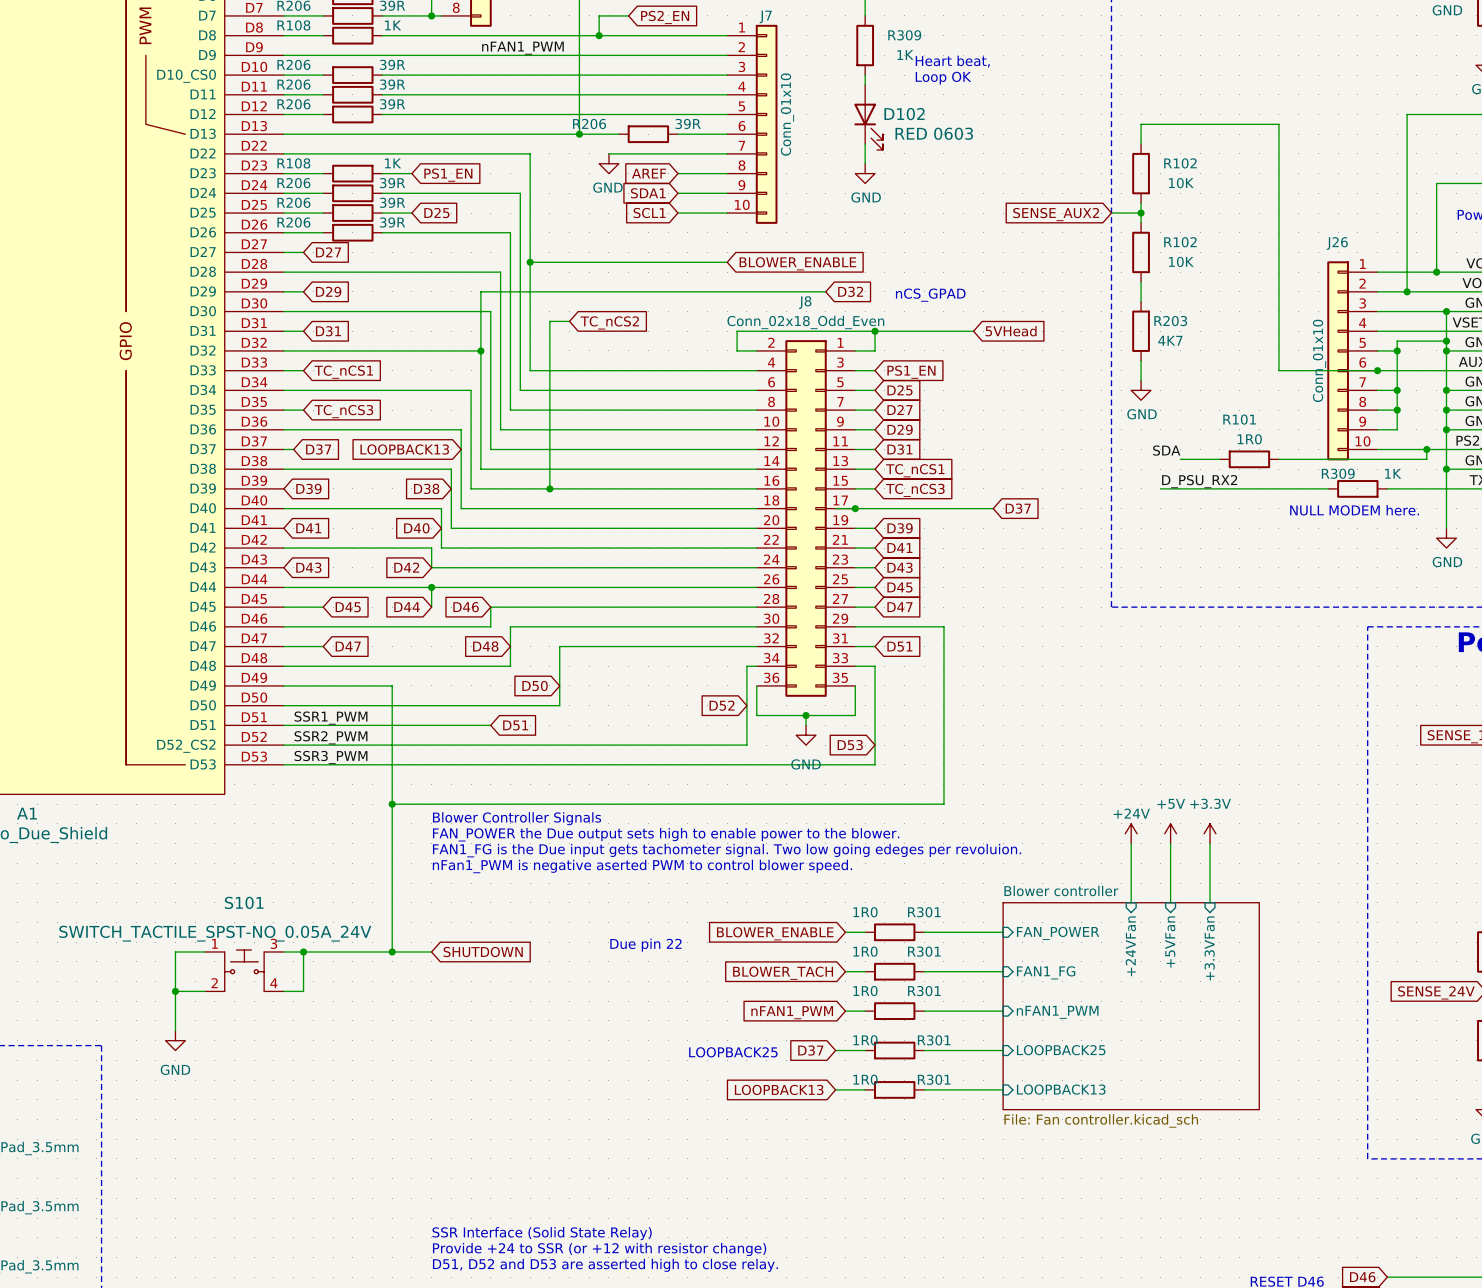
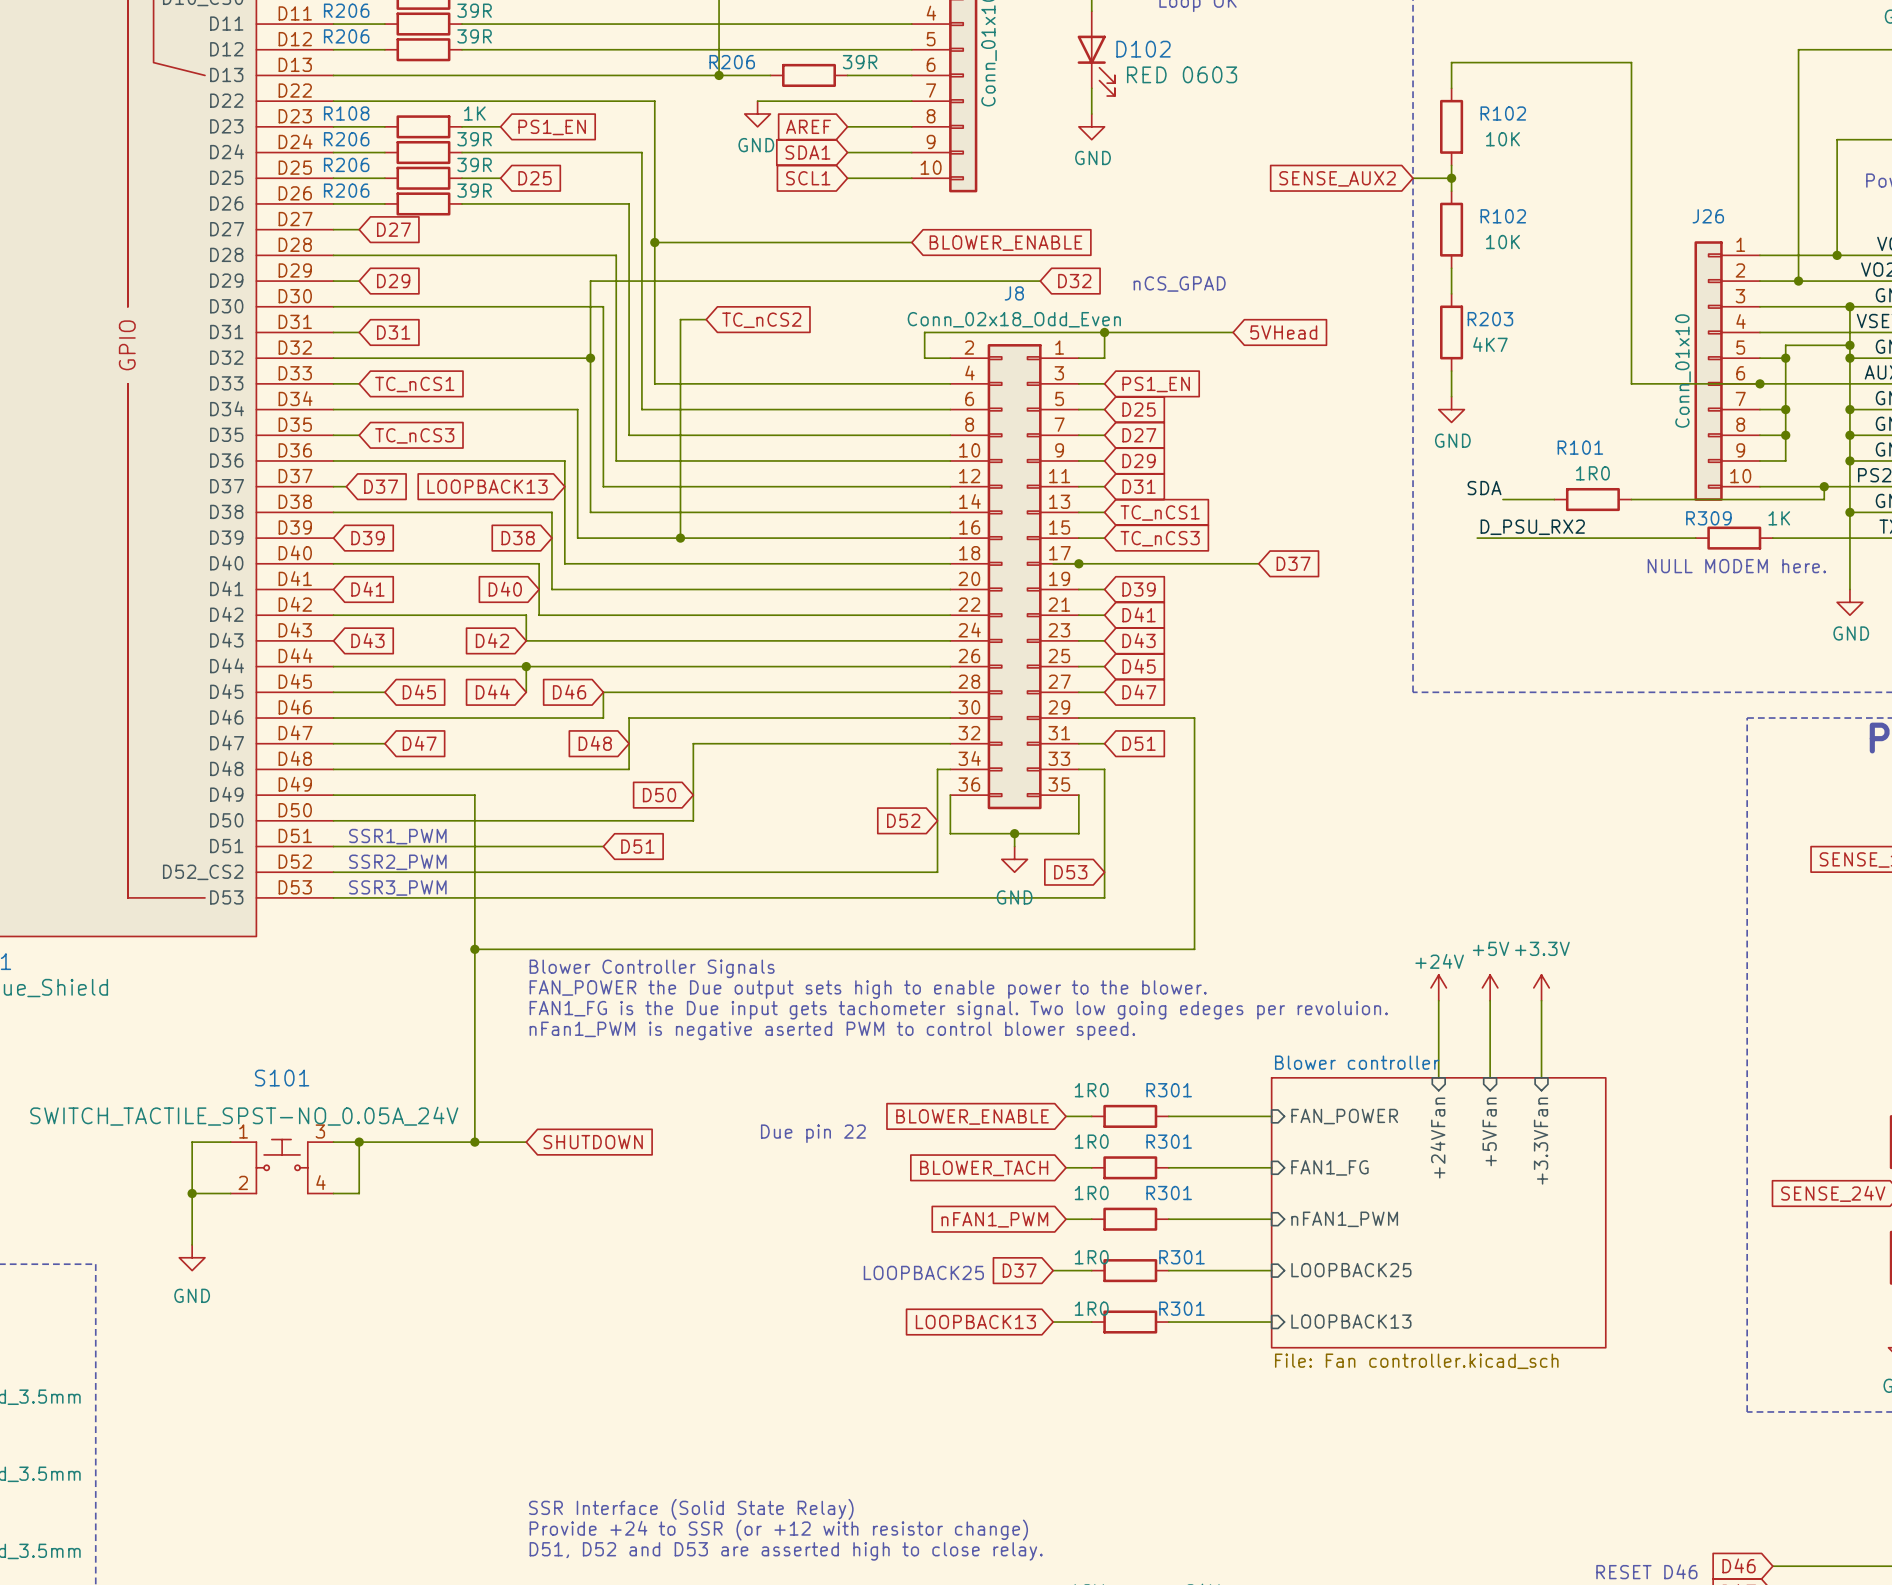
label: SSR1_PWM (331, 718) -> none
text: none -> SSR1_PWM (397, 836)
label: SSR2_PWM (331, 737) -> none
text: none -> SSR2_PWM (397, 862)
label: SSR3_PWM (331, 757) -> none
text: none -> SSR3_PWM (397, 888)

